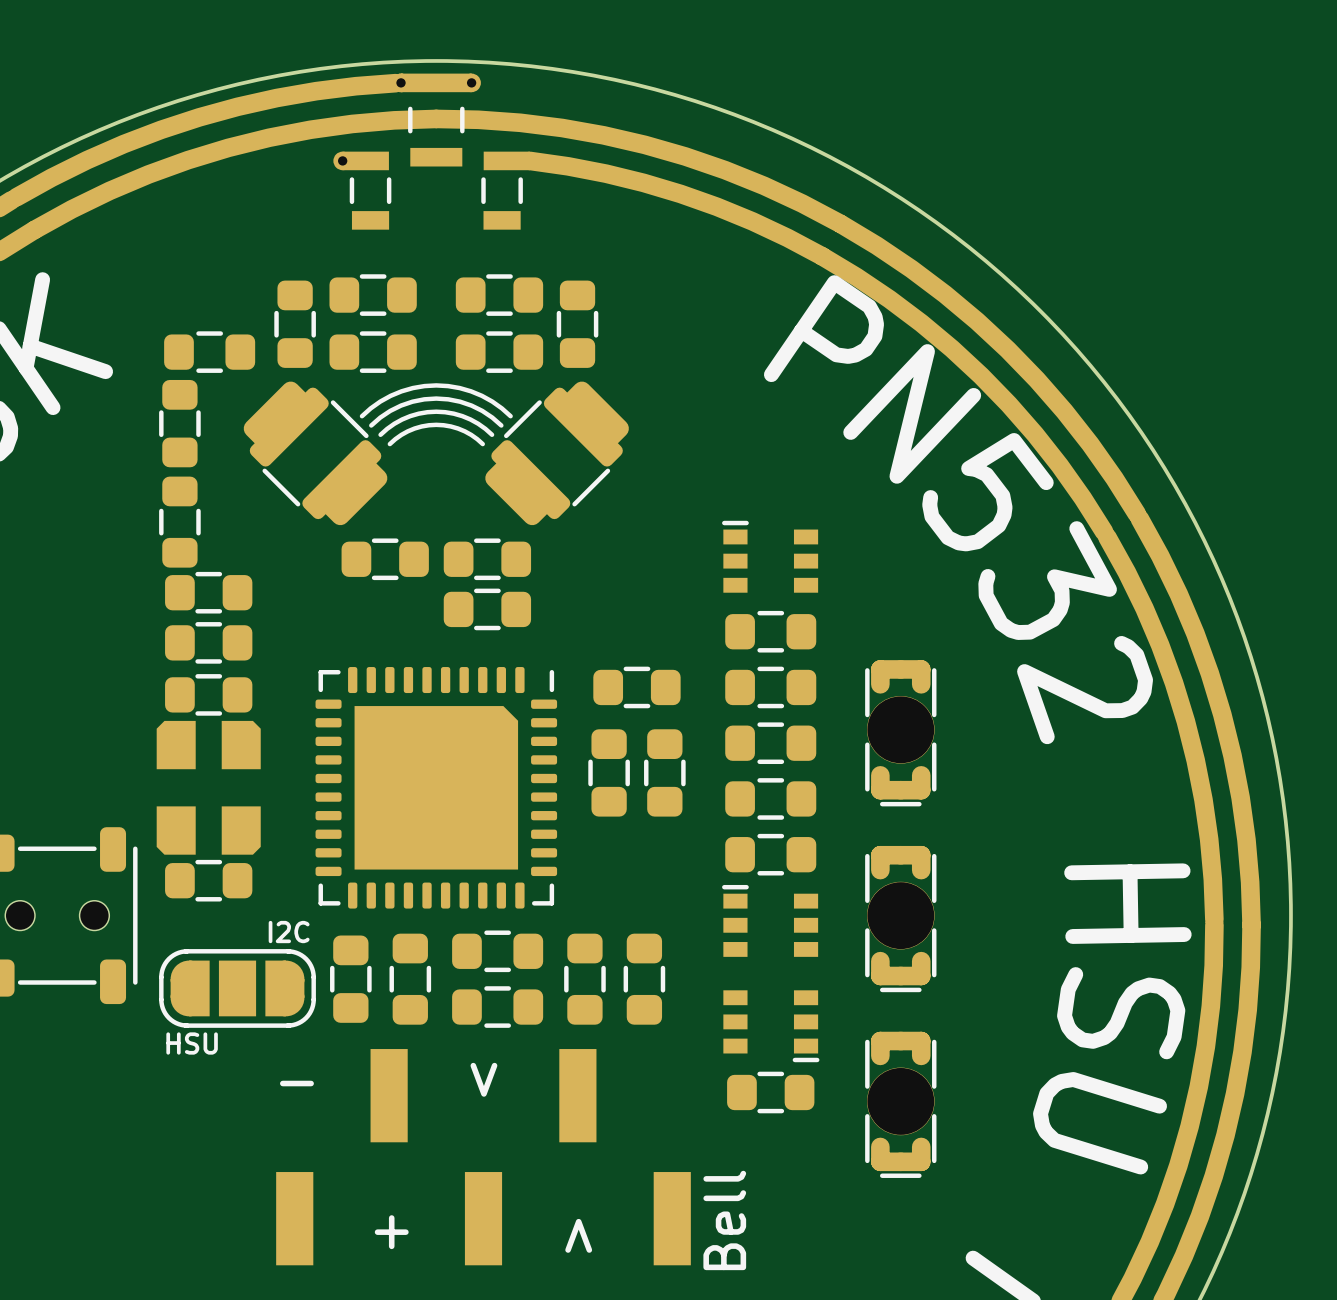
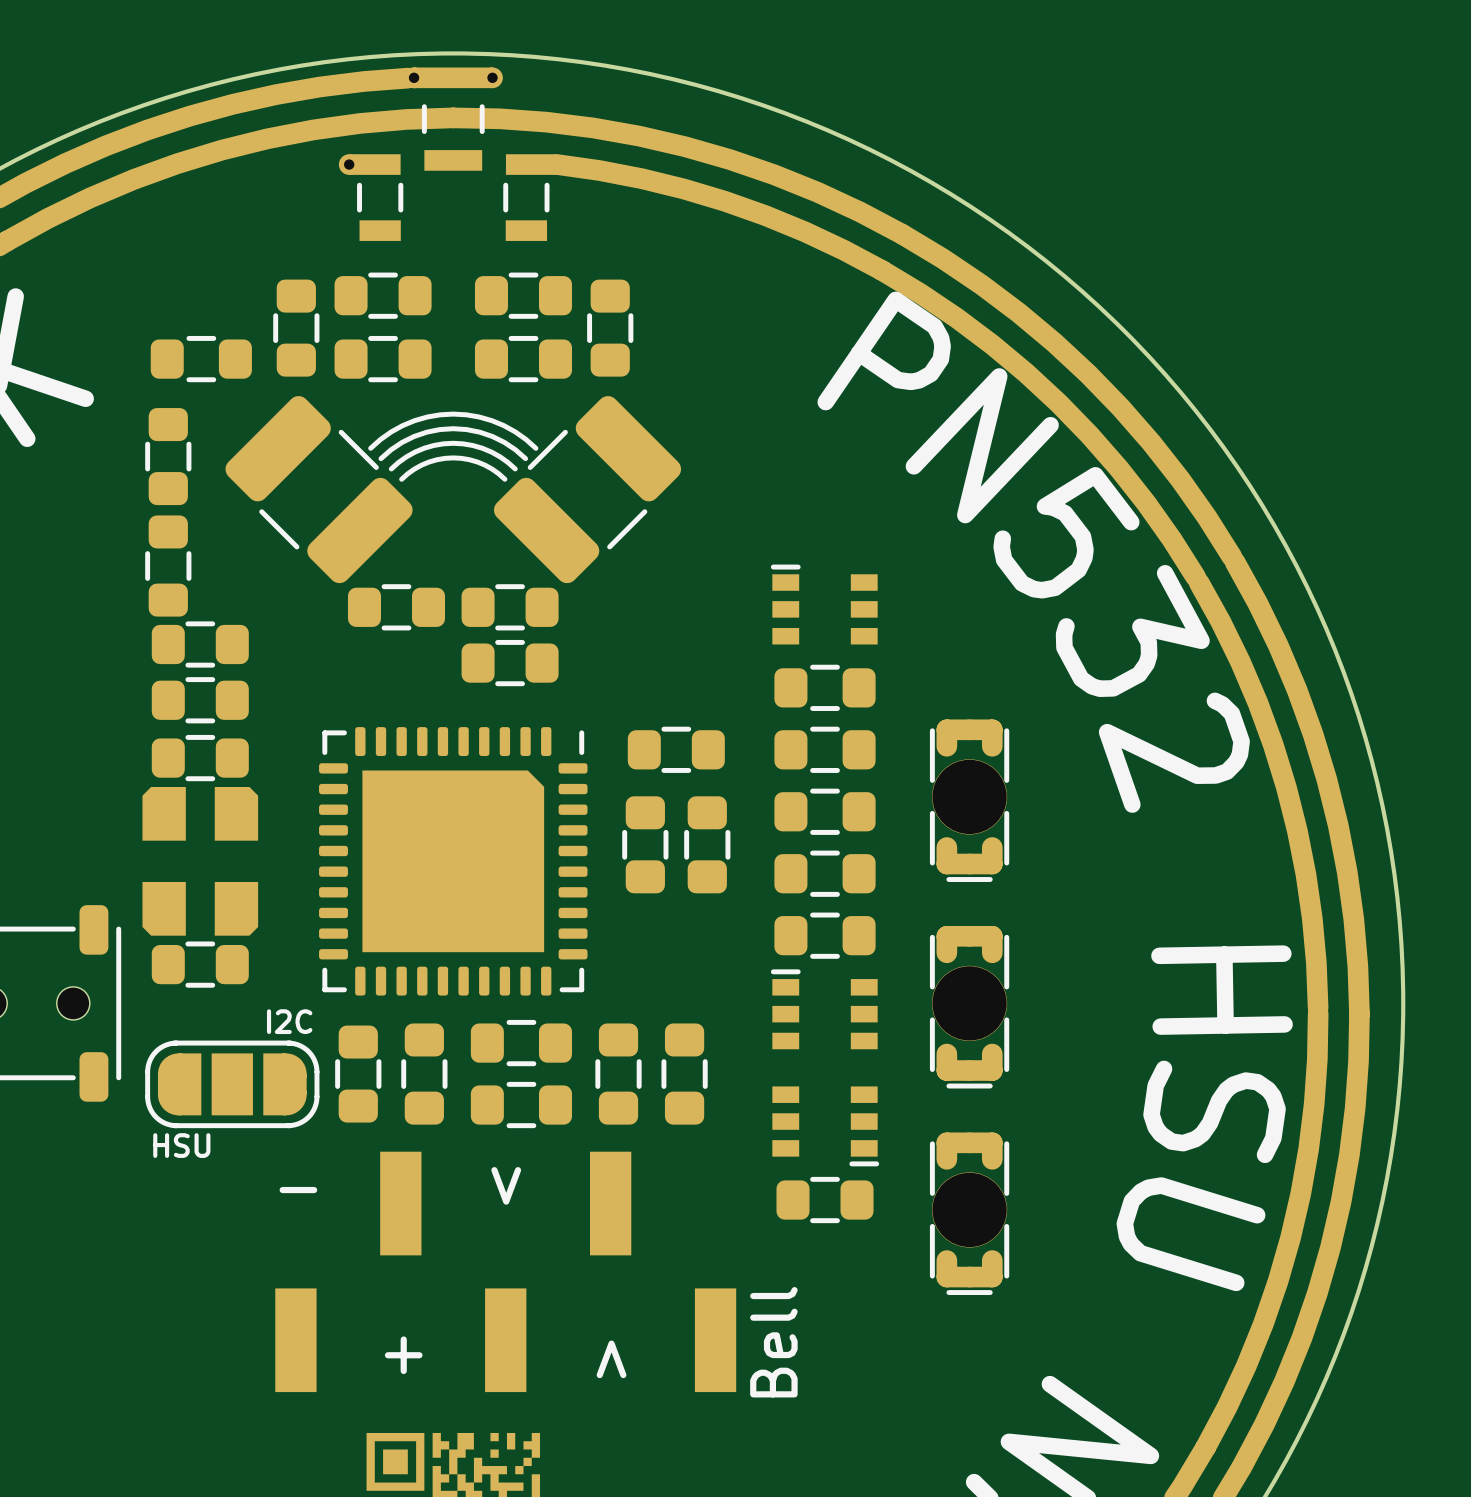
part position: (373, 295) -> (383, 295)
part position: (499, 295) -> (523, 295)
part position: (295, 324) -> (296, 328)
part position: (577, 324) -> (610, 328)
part position: (209, 352) -> (201, 359)
part position: (373, 352) -> (383, 359)
part position: (499, 352) -> (523, 359)
part footprint: [243, 381, 388, 526] -> [225, 396, 413, 584]
part footprint: [485, 381, 629, 526] -> [493, 396, 682, 584]

